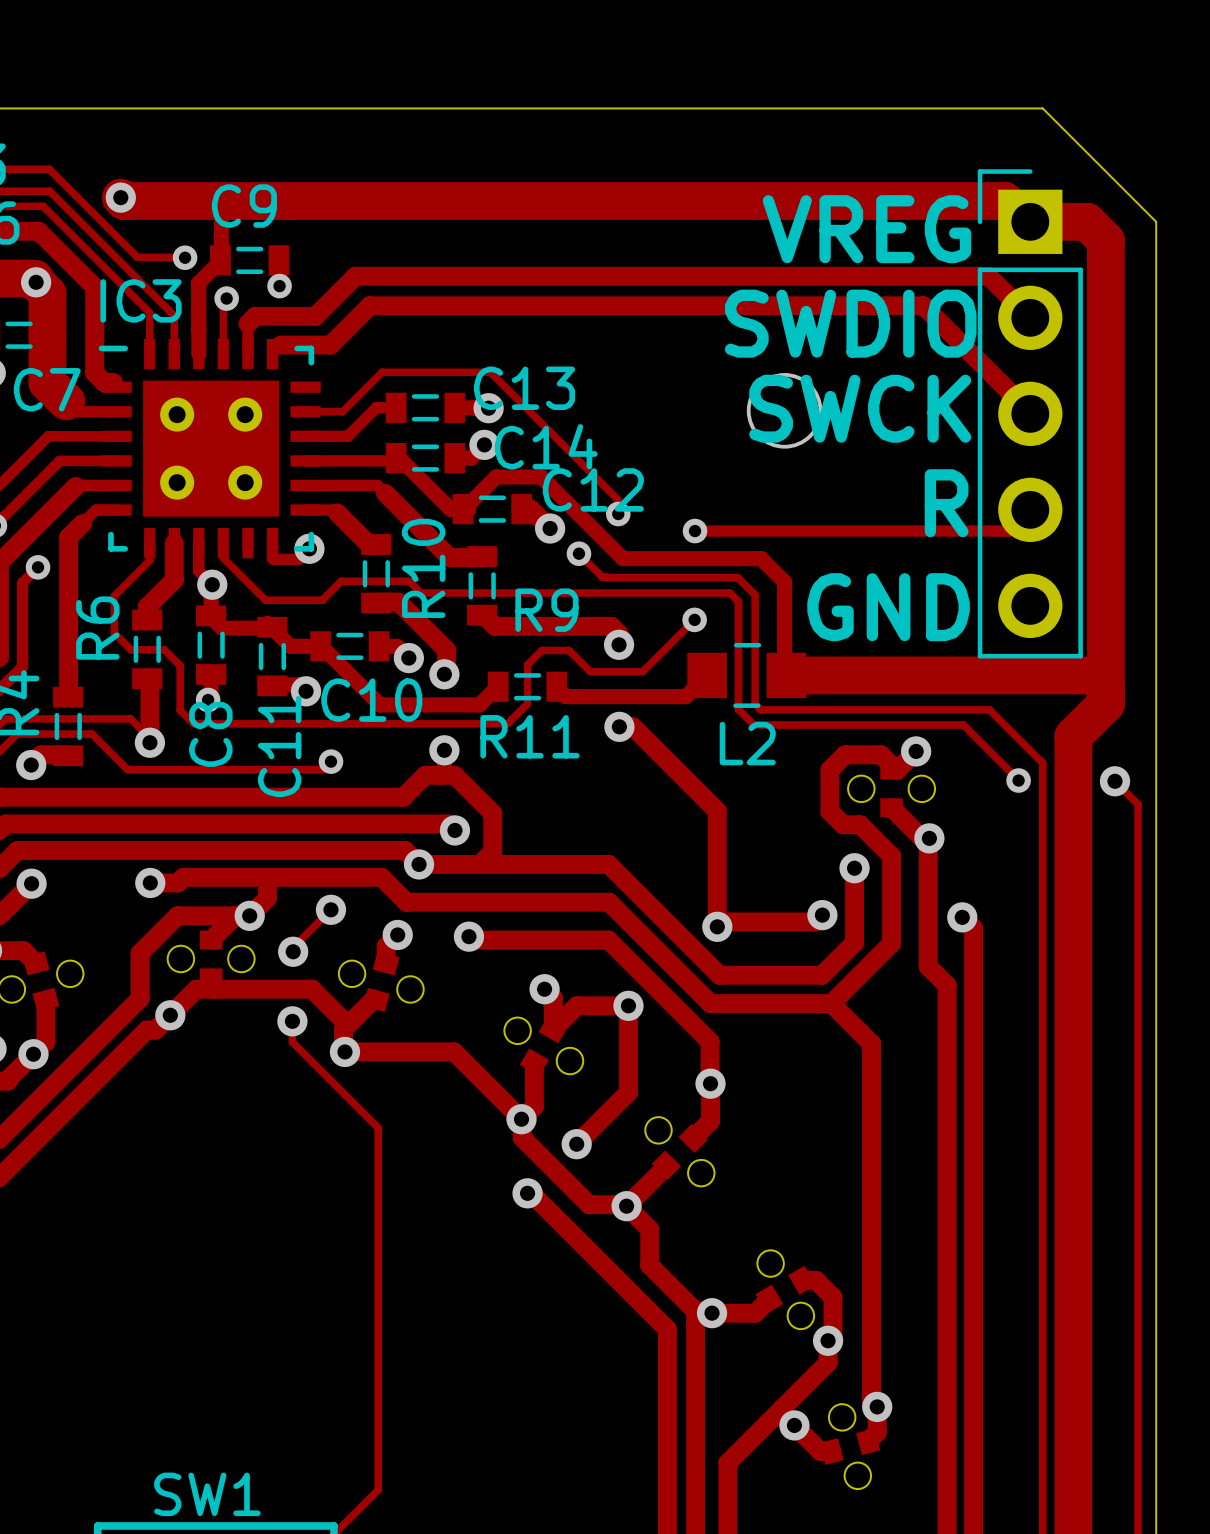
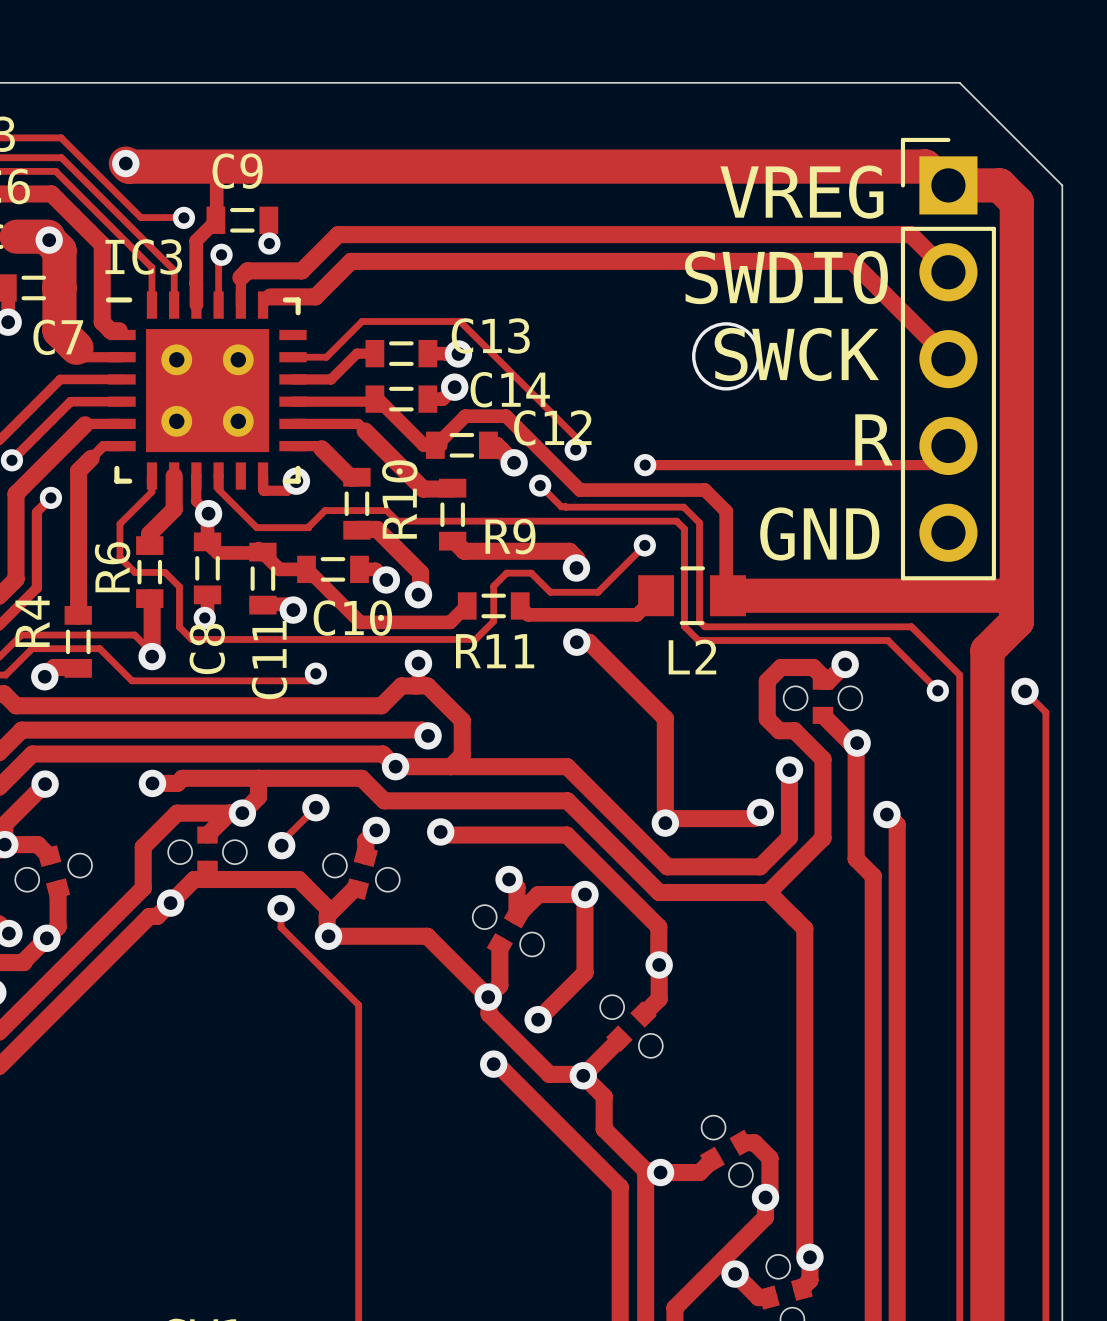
R6 name position: R6 (97, 628) -> R6 (112, 567)

